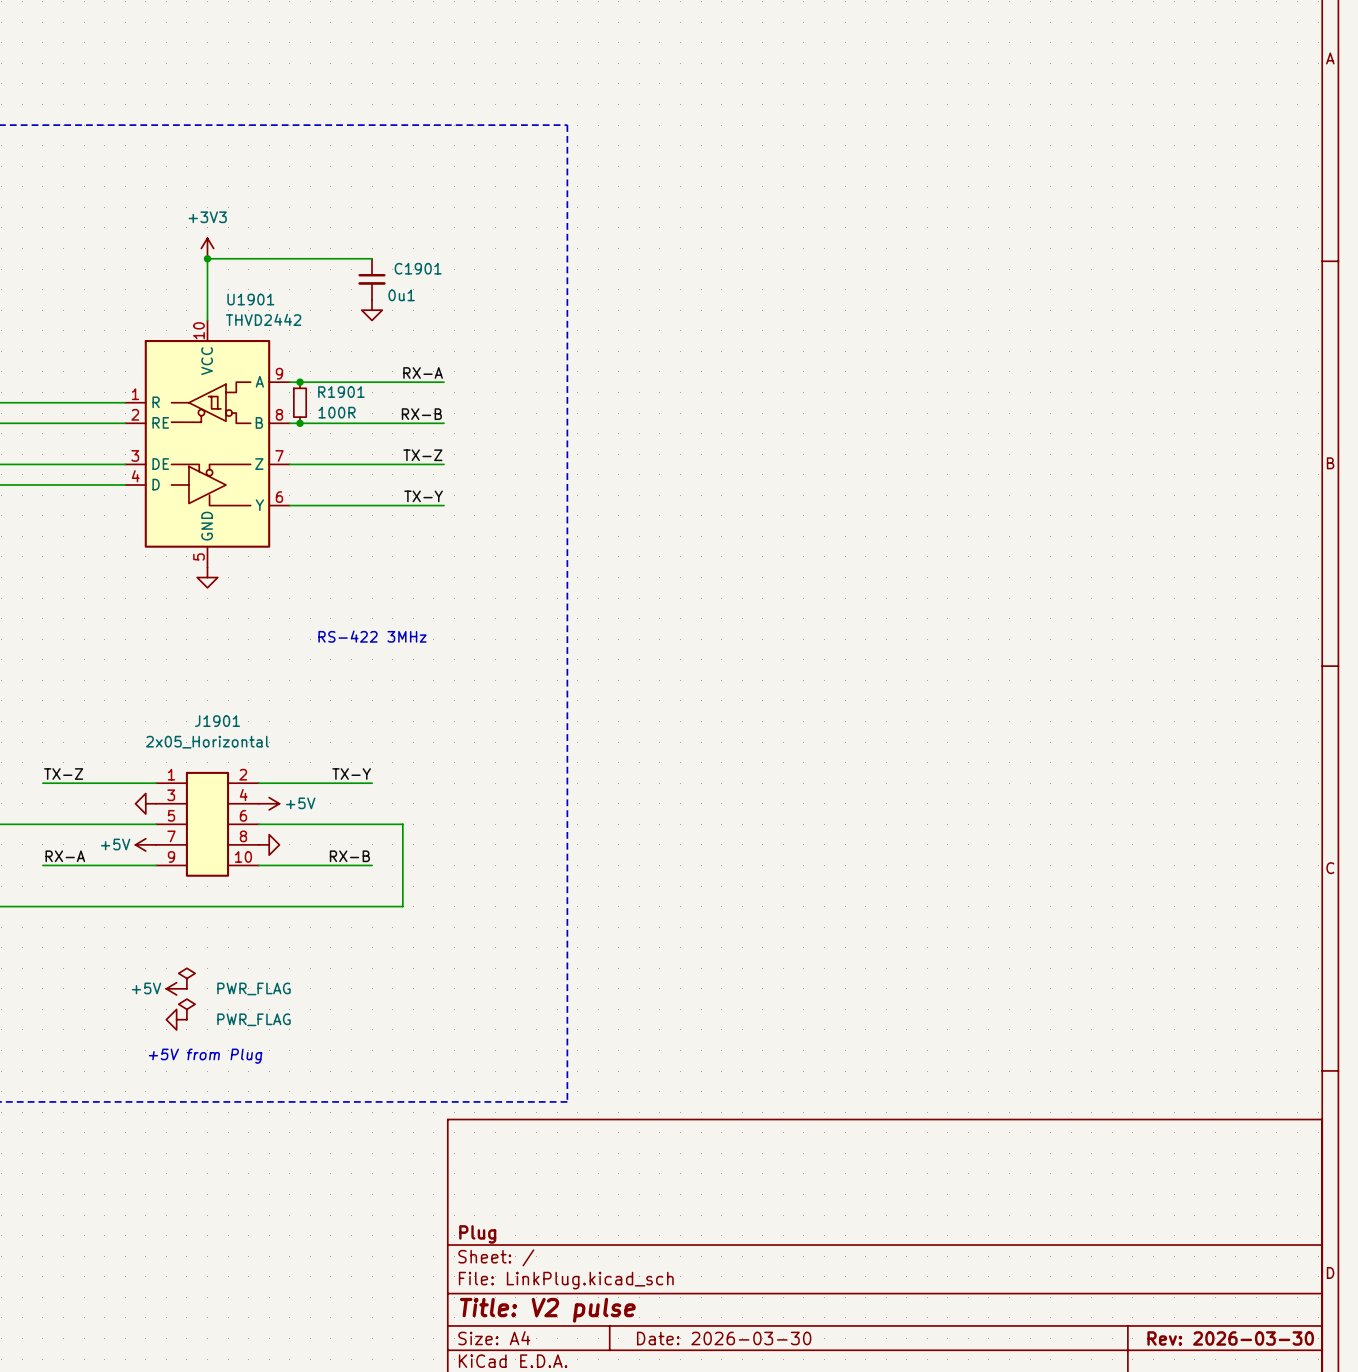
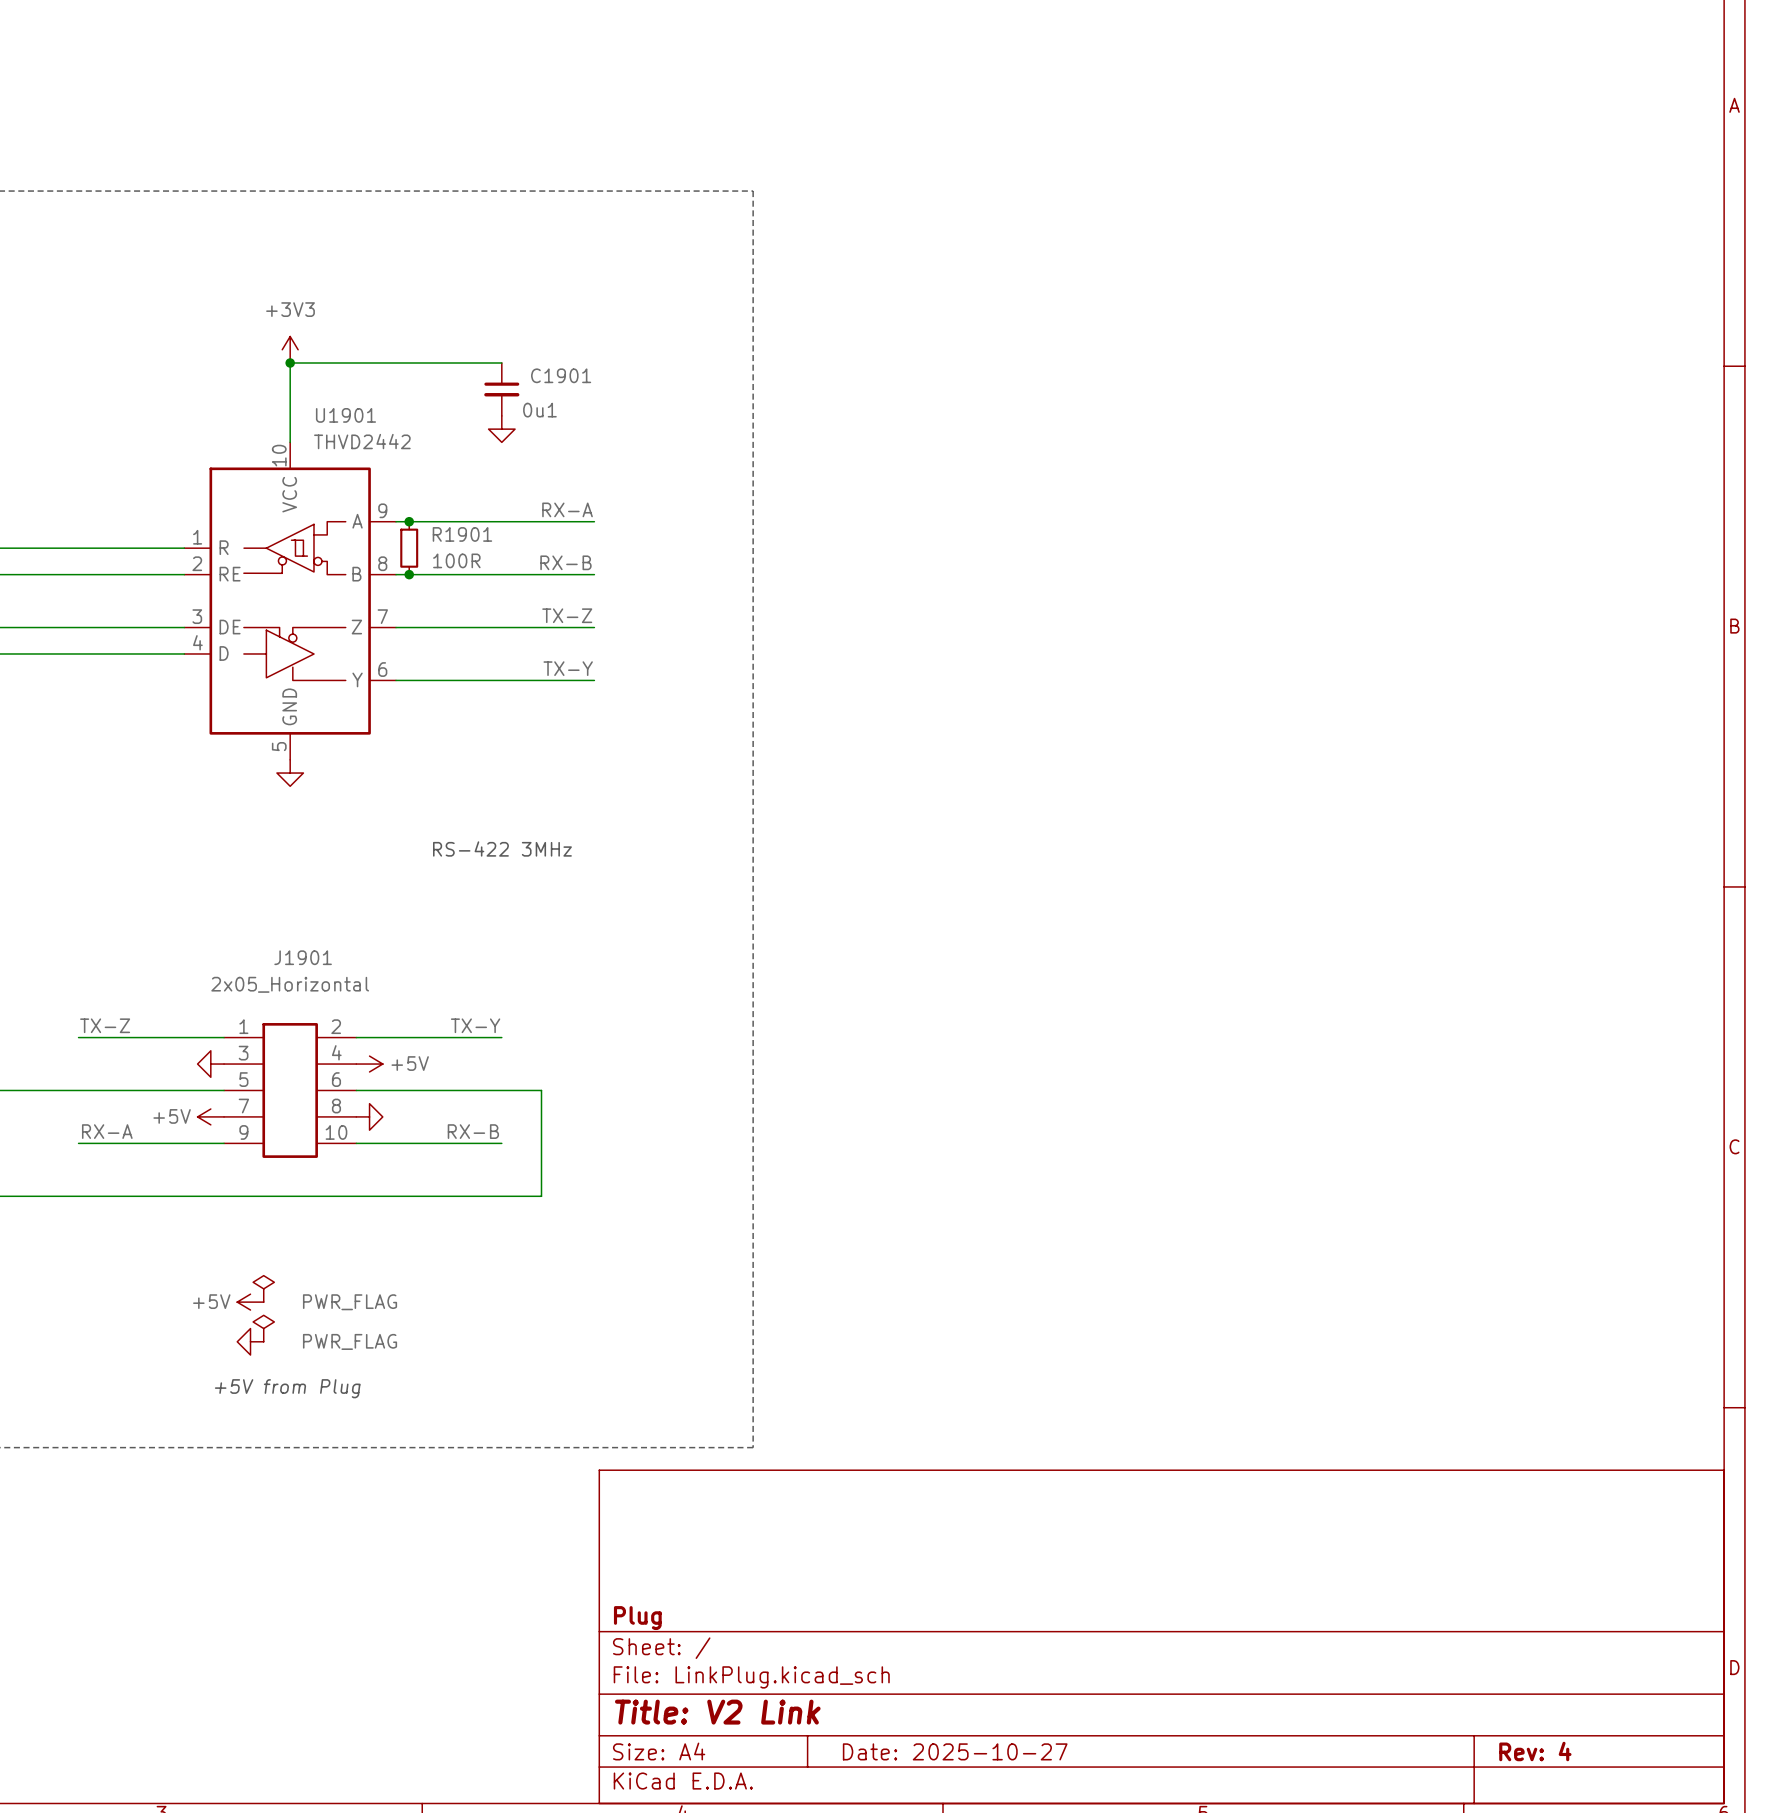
title block: Title: V2 pulse (547, 1310) -> Title: V2 Link (717, 1712)
title block: Date: 2026-03-30 (724, 1338) -> Date: 2025-10-27 (955, 1751)
title block: Rev: 2026-03-30 (1230, 1338) -> Rev: 4 (1535, 1751)

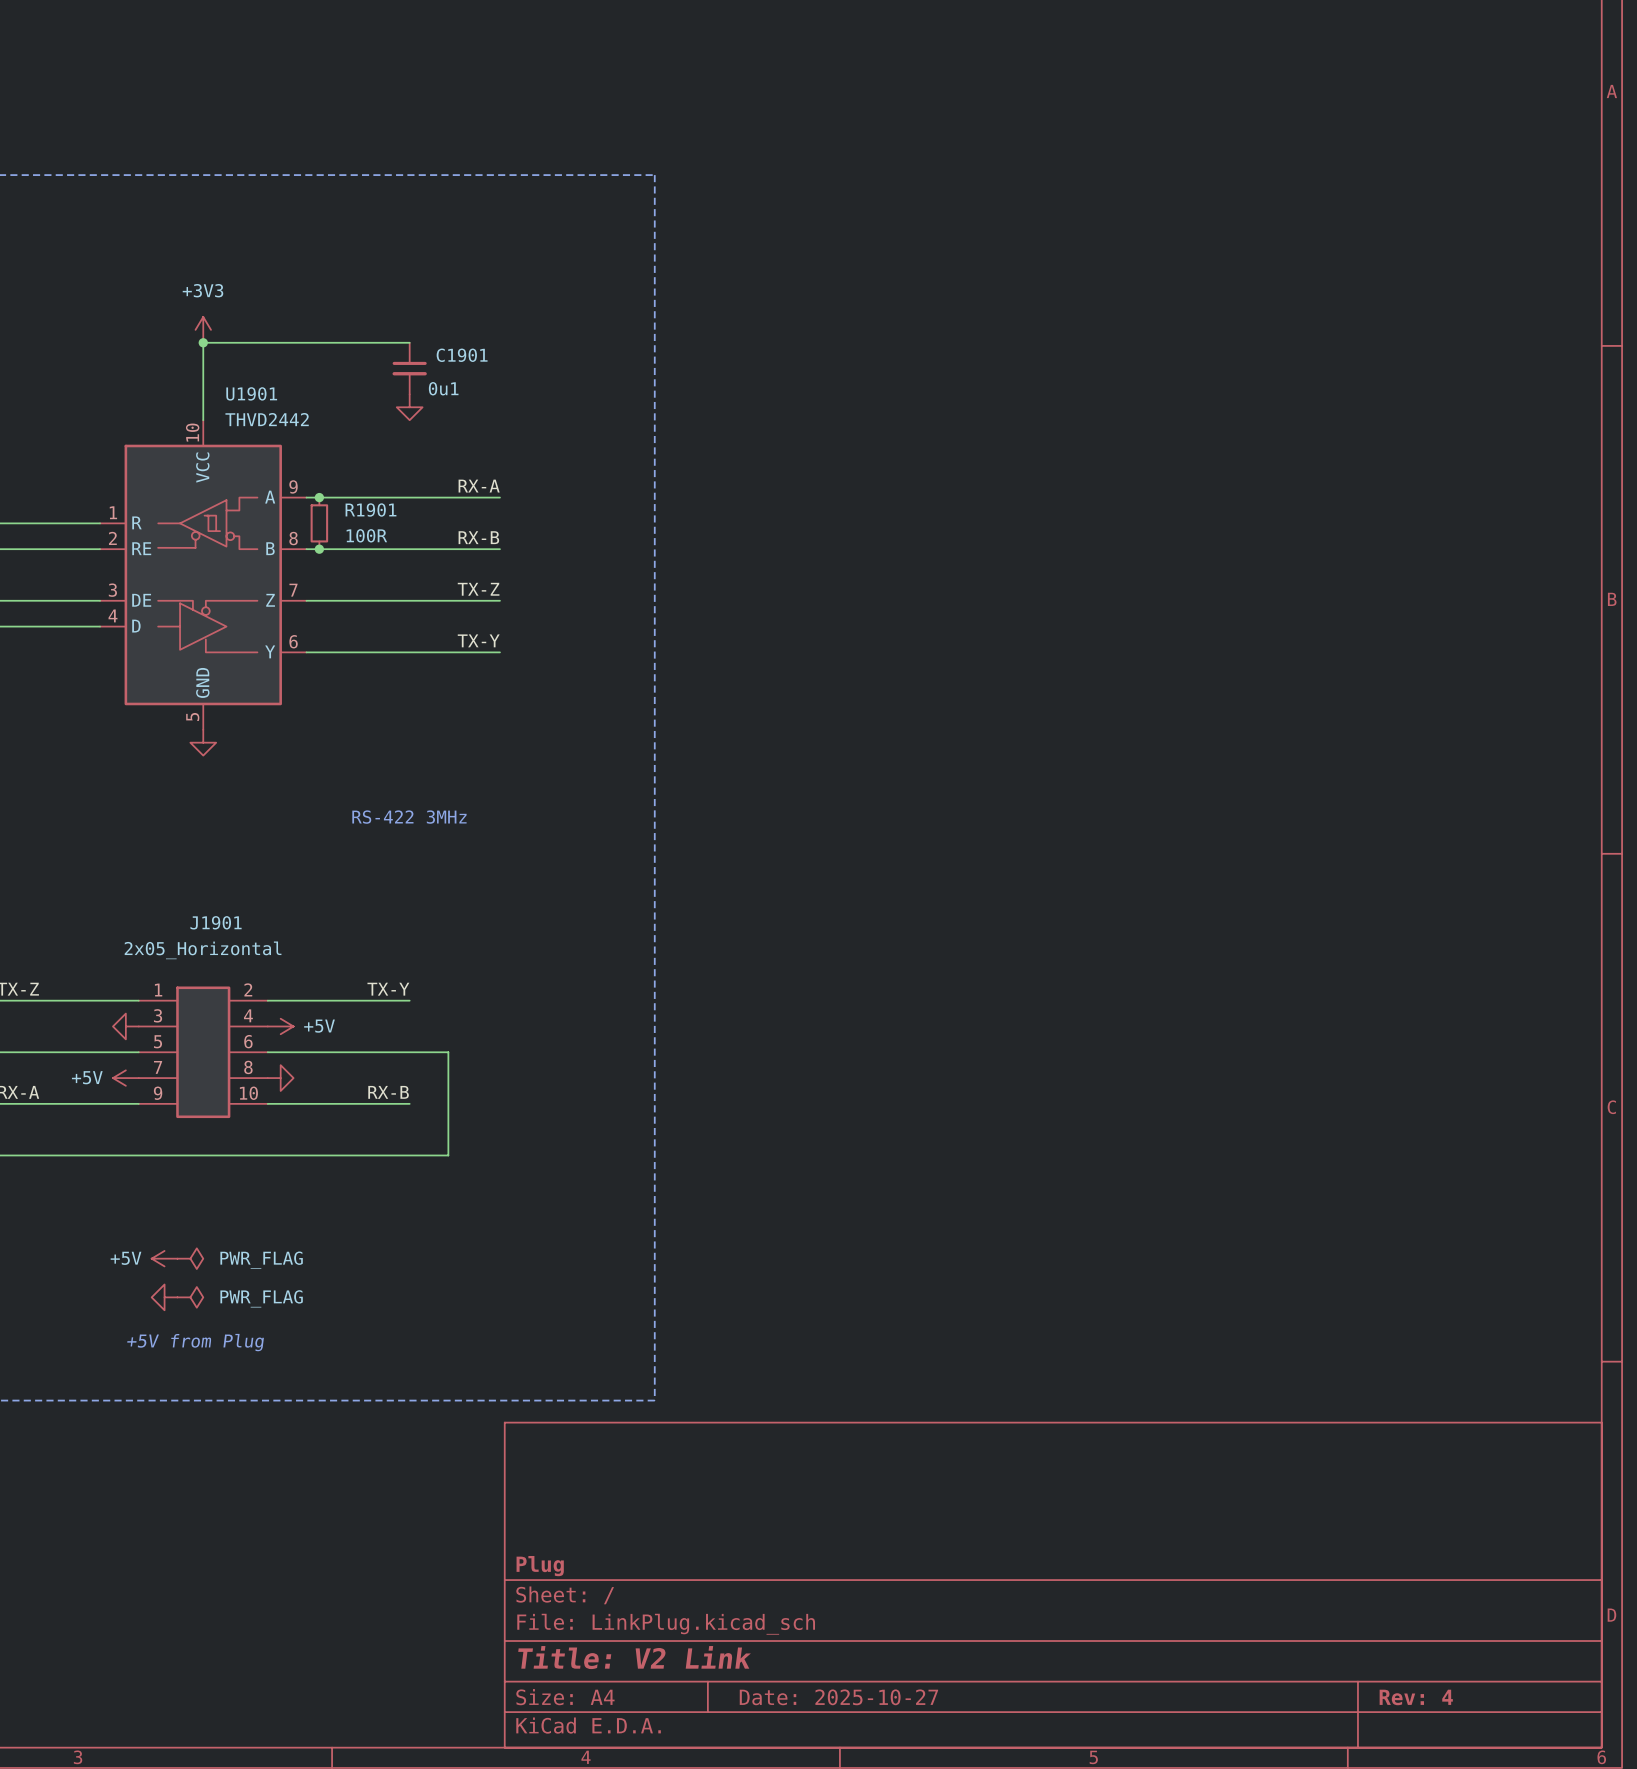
power symbol: PWR_FLAG (263, 1288) -> none
power symbol: none -> PWR_FLAG (190, 1258)
power symbol: PWR_FLAG (263, 1328) -> none
power symbol: none -> PWR_FLAG (190, 1297)

